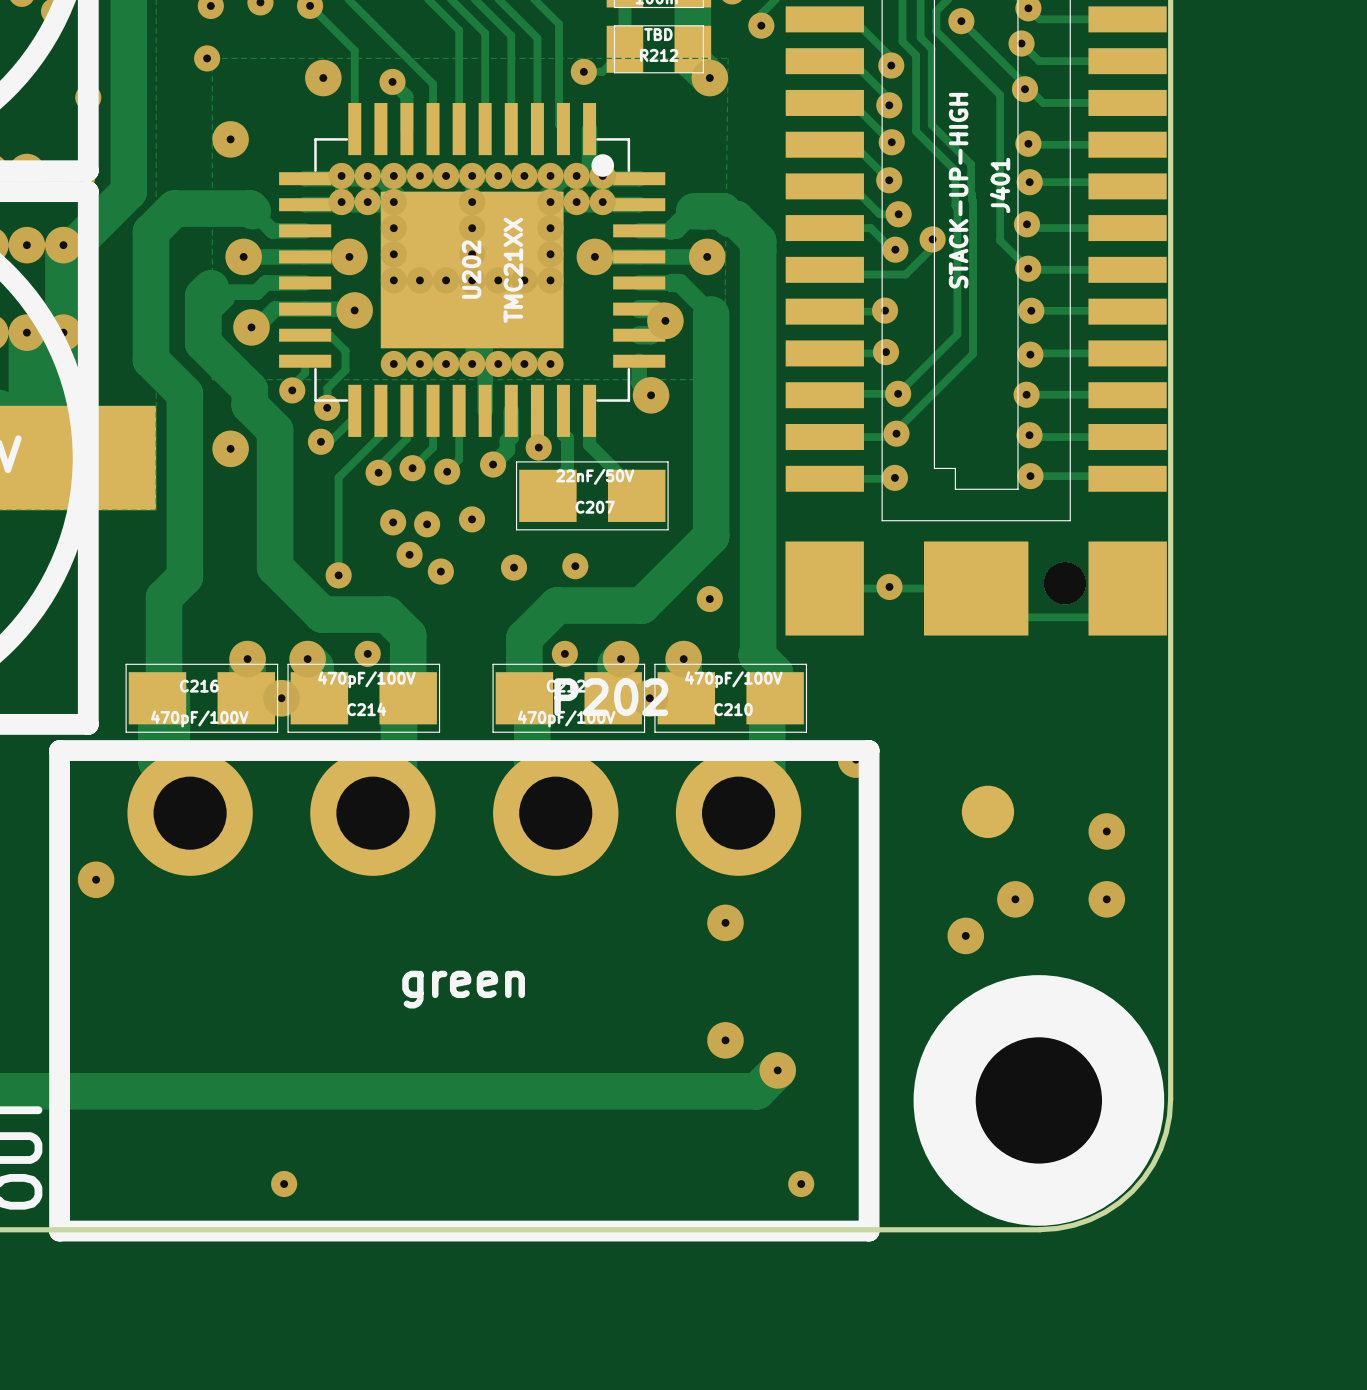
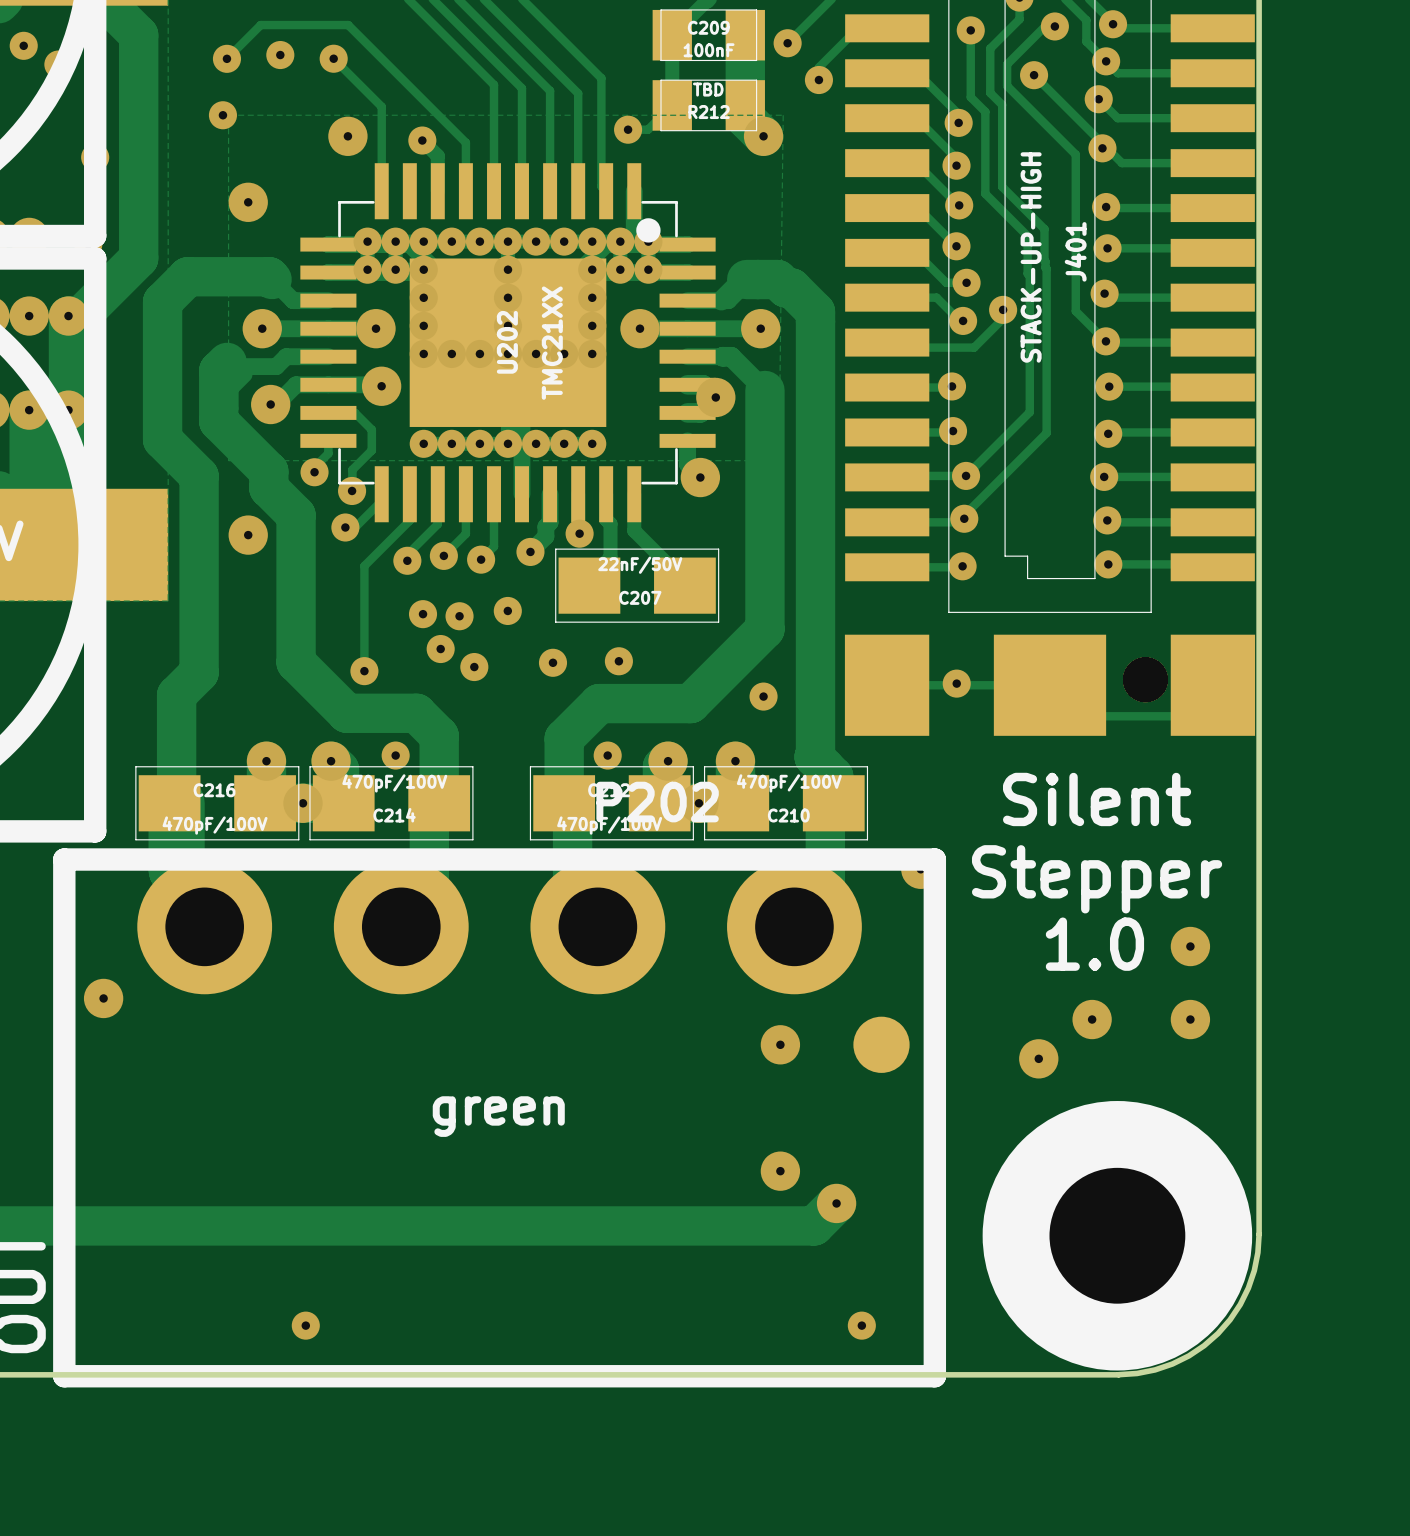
text: none -> Silent (1097, 799)
text: none -> Stepper (1097, 879)
part position: (987, 811) -> (881, 1044)
text: none -> 1.0 (1094, 944)

